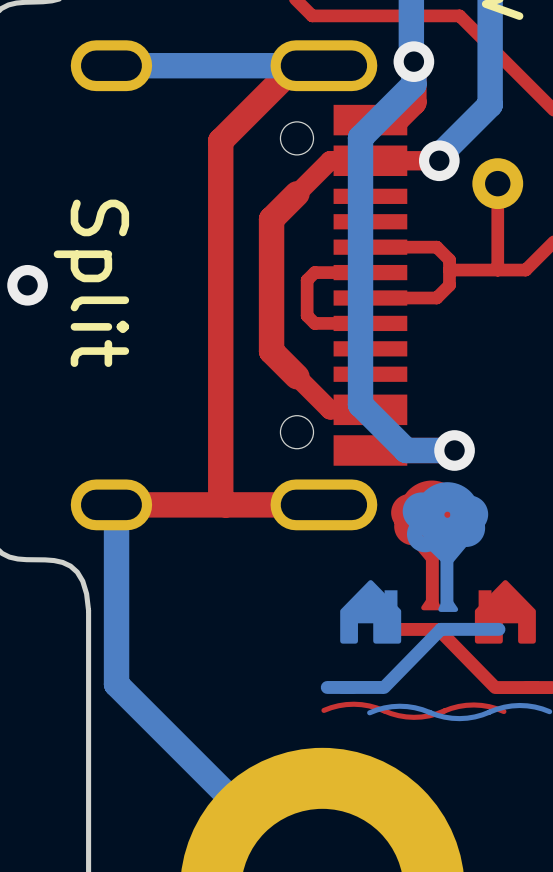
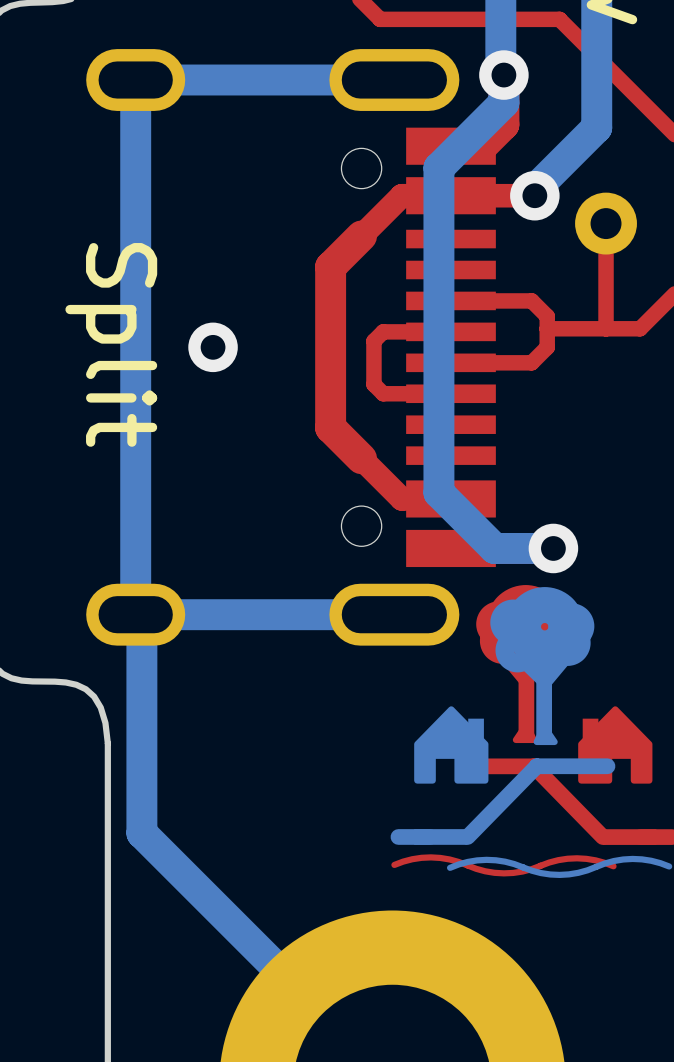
bottom track: none -> (135, 80) (135, 614) (394, 614)
top track: (323, 65) (295, 65) (220, 140) (220, 499) (225, 504) -> none
via position: (27, 285) -> (213, 347)
top track: (323, 504) (111, 504) -> none

